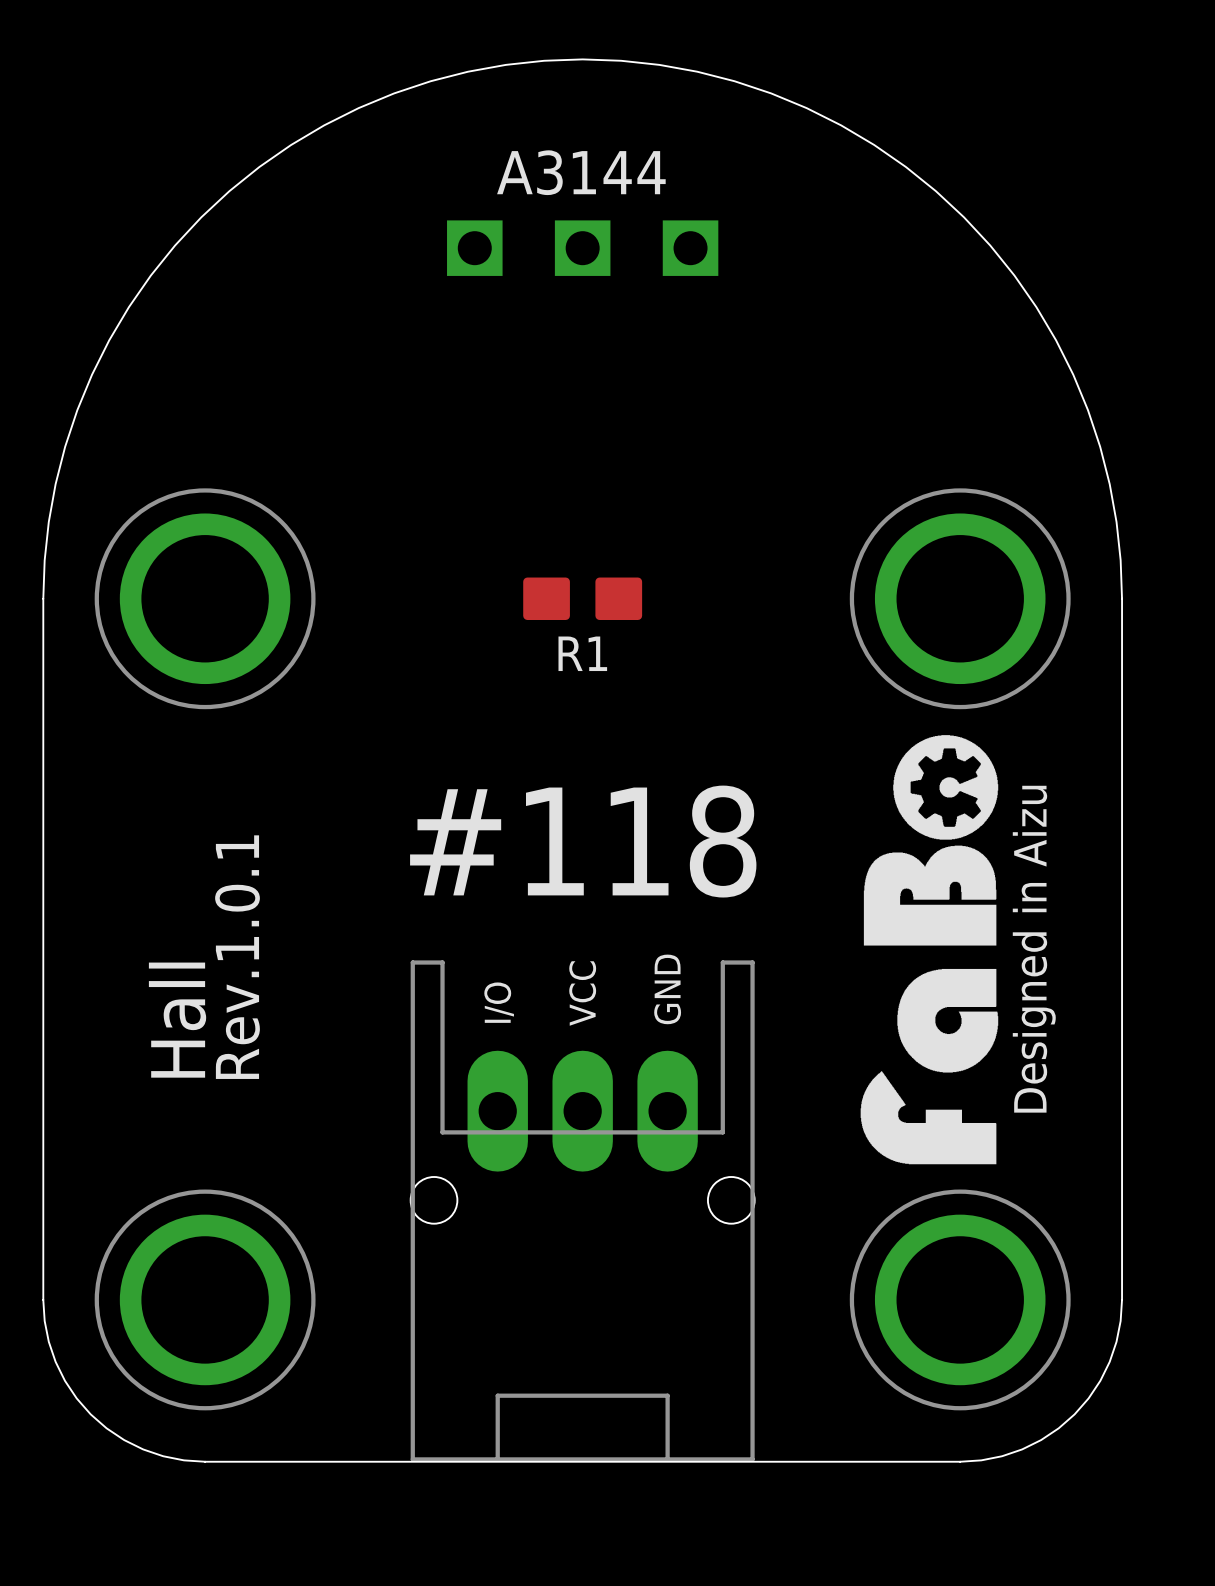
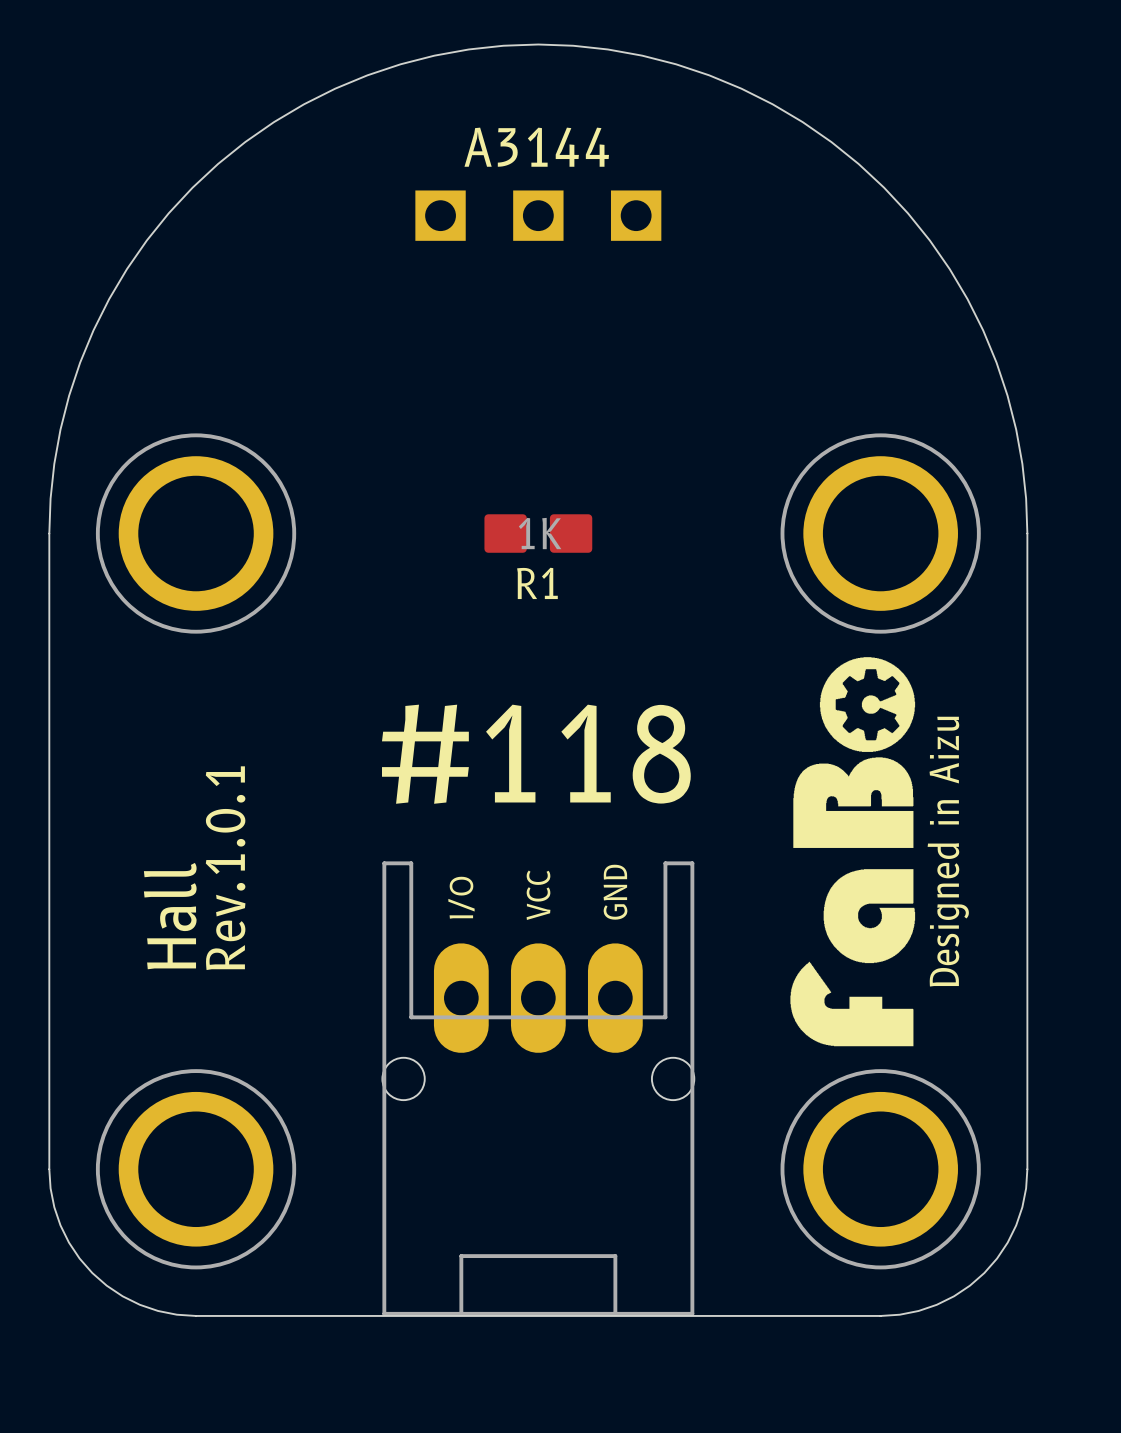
R1 value: none -> 1K (540, 533)

